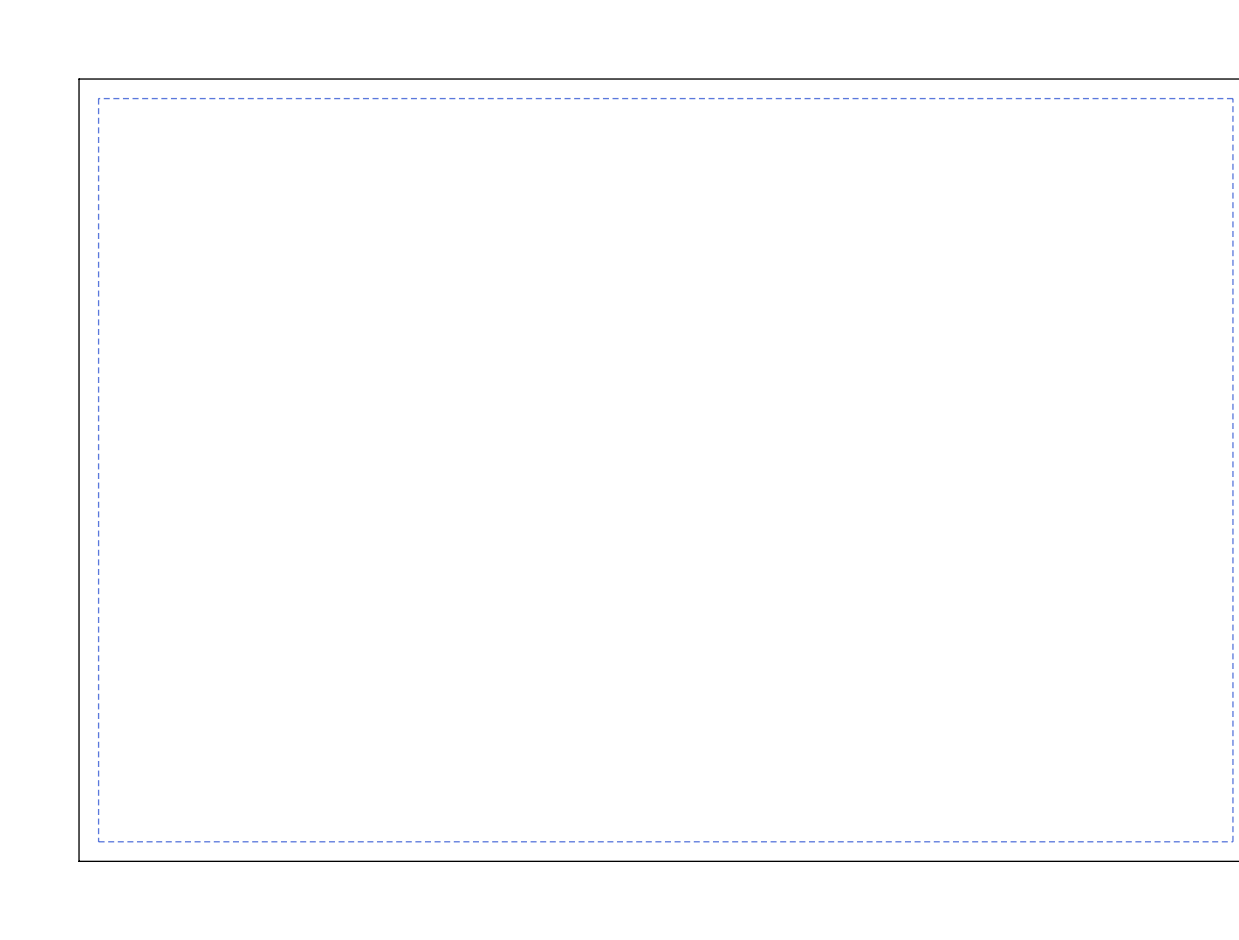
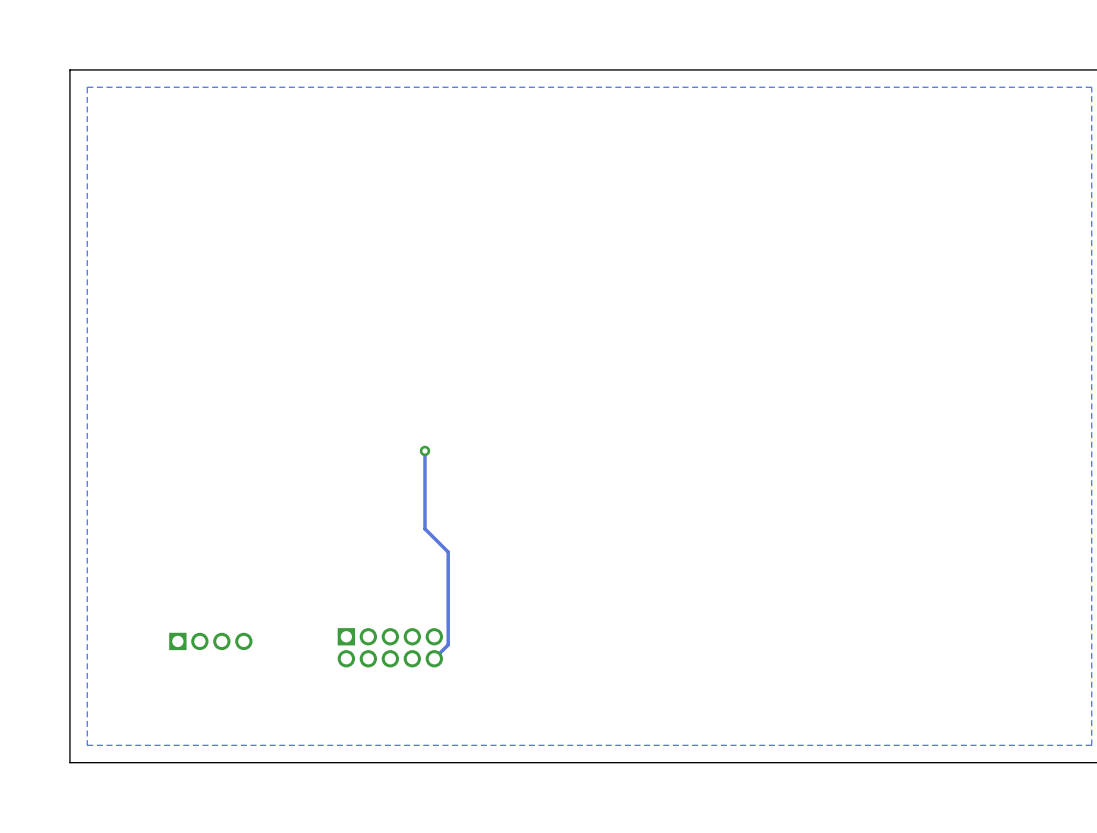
track: none -> (424, 450) (424, 528) (448, 552) (448, 644) (434, 658)
via: none -> (424, 450)
part: none -> (210, 641)
part: none -> (390, 647)

